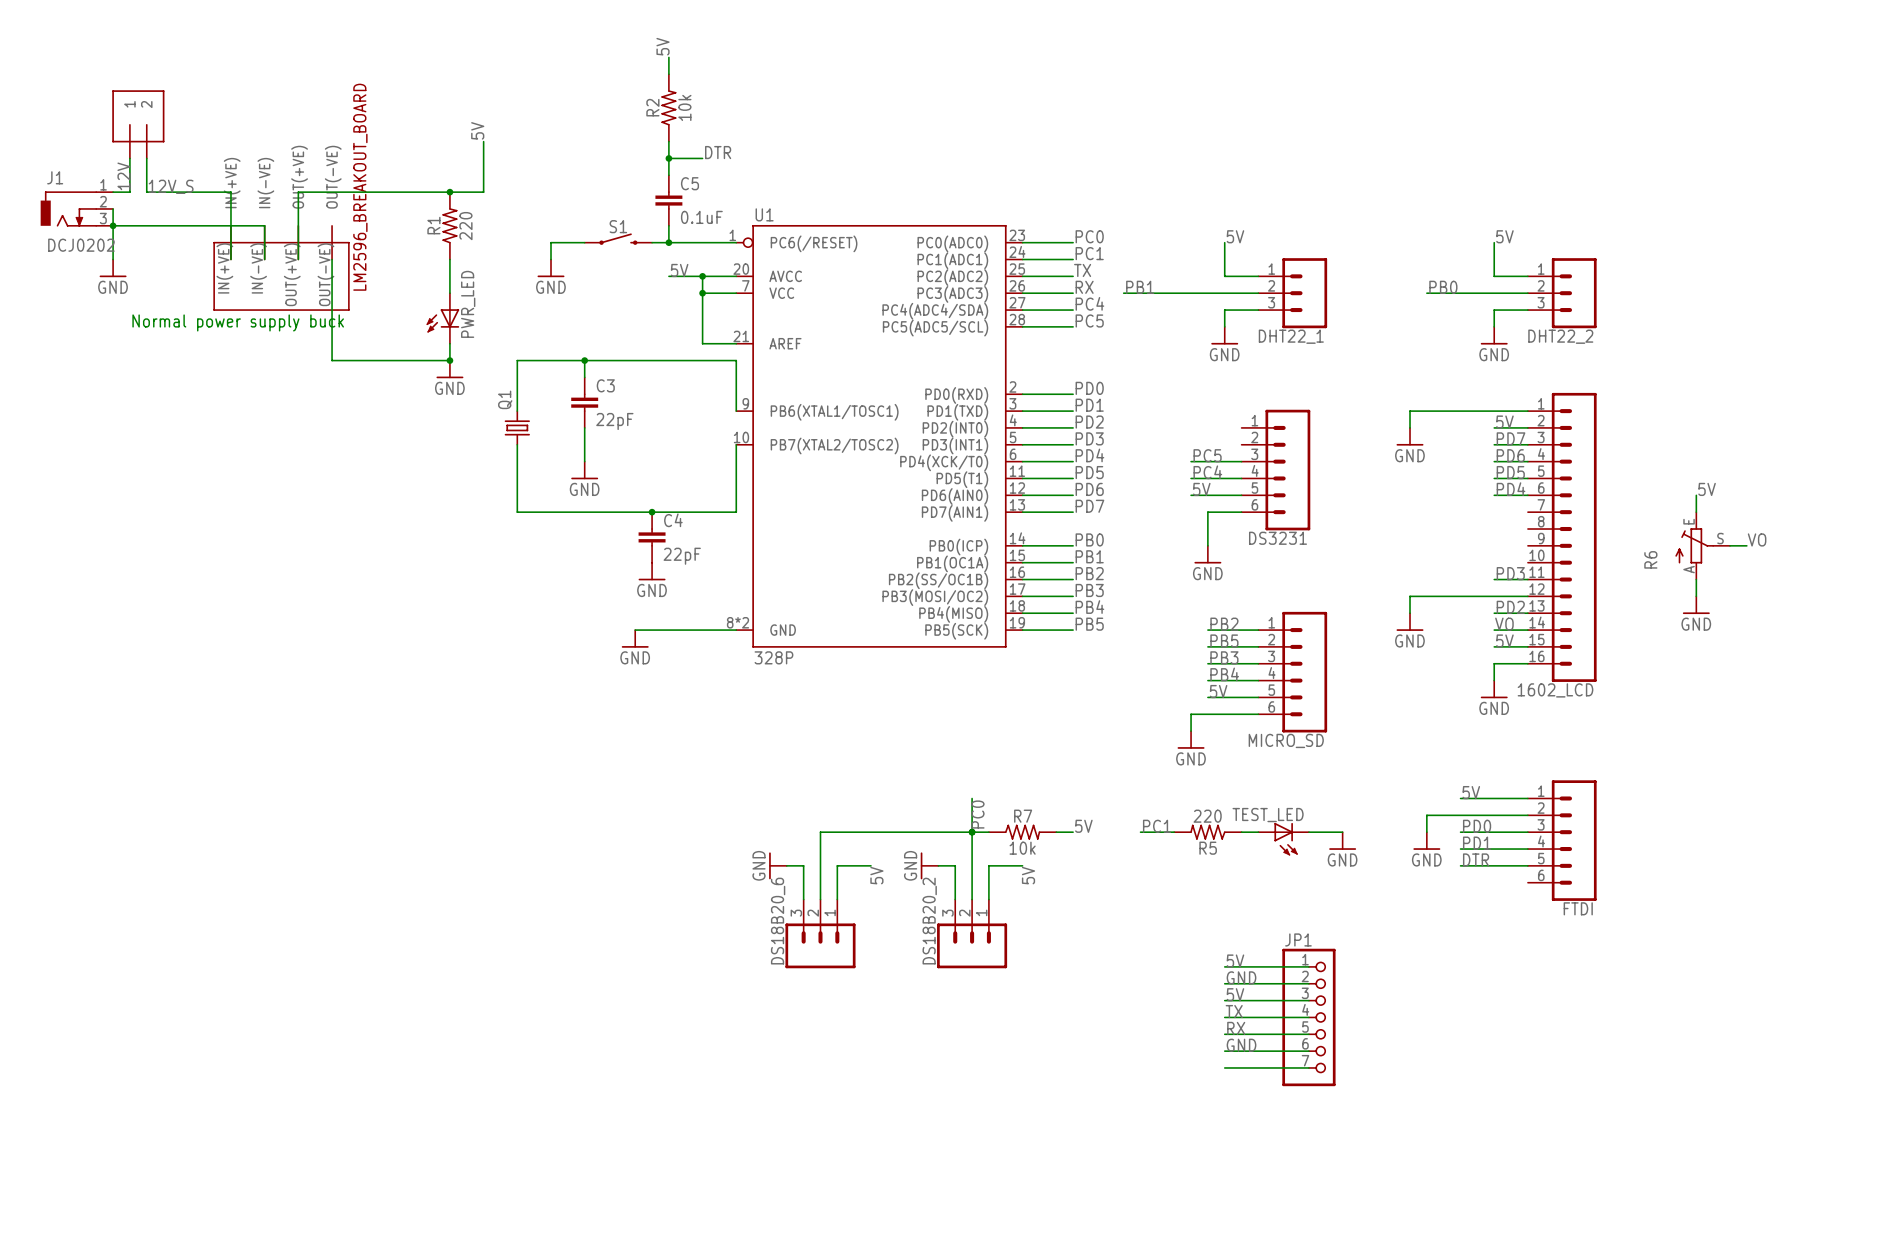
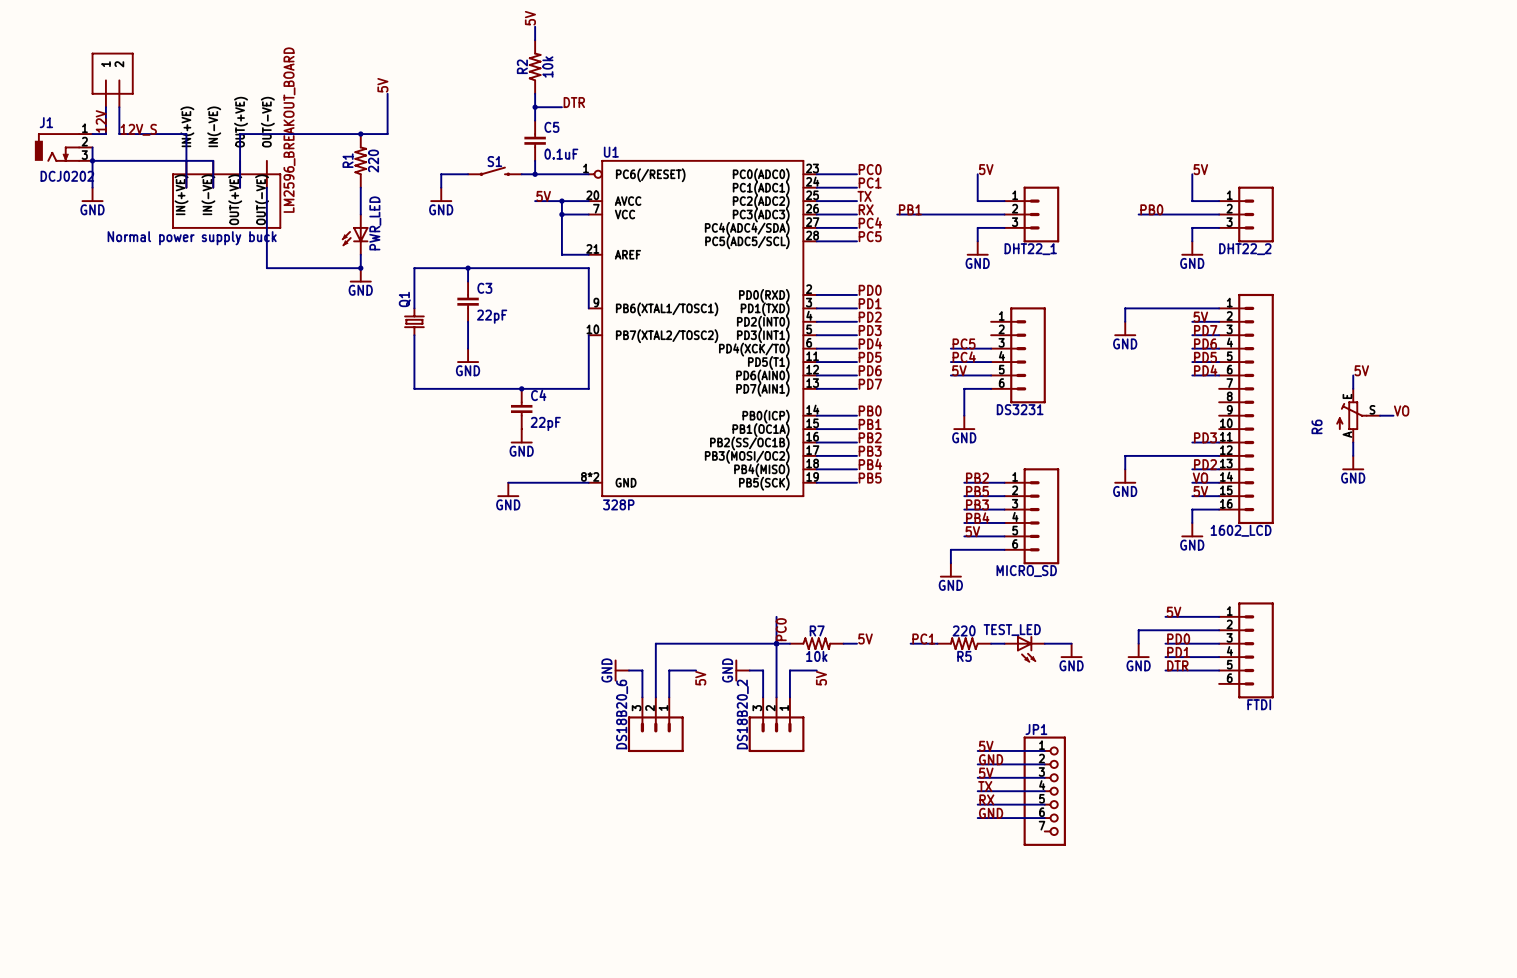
wire: (1224, 1067) (1308, 1067) -> none

